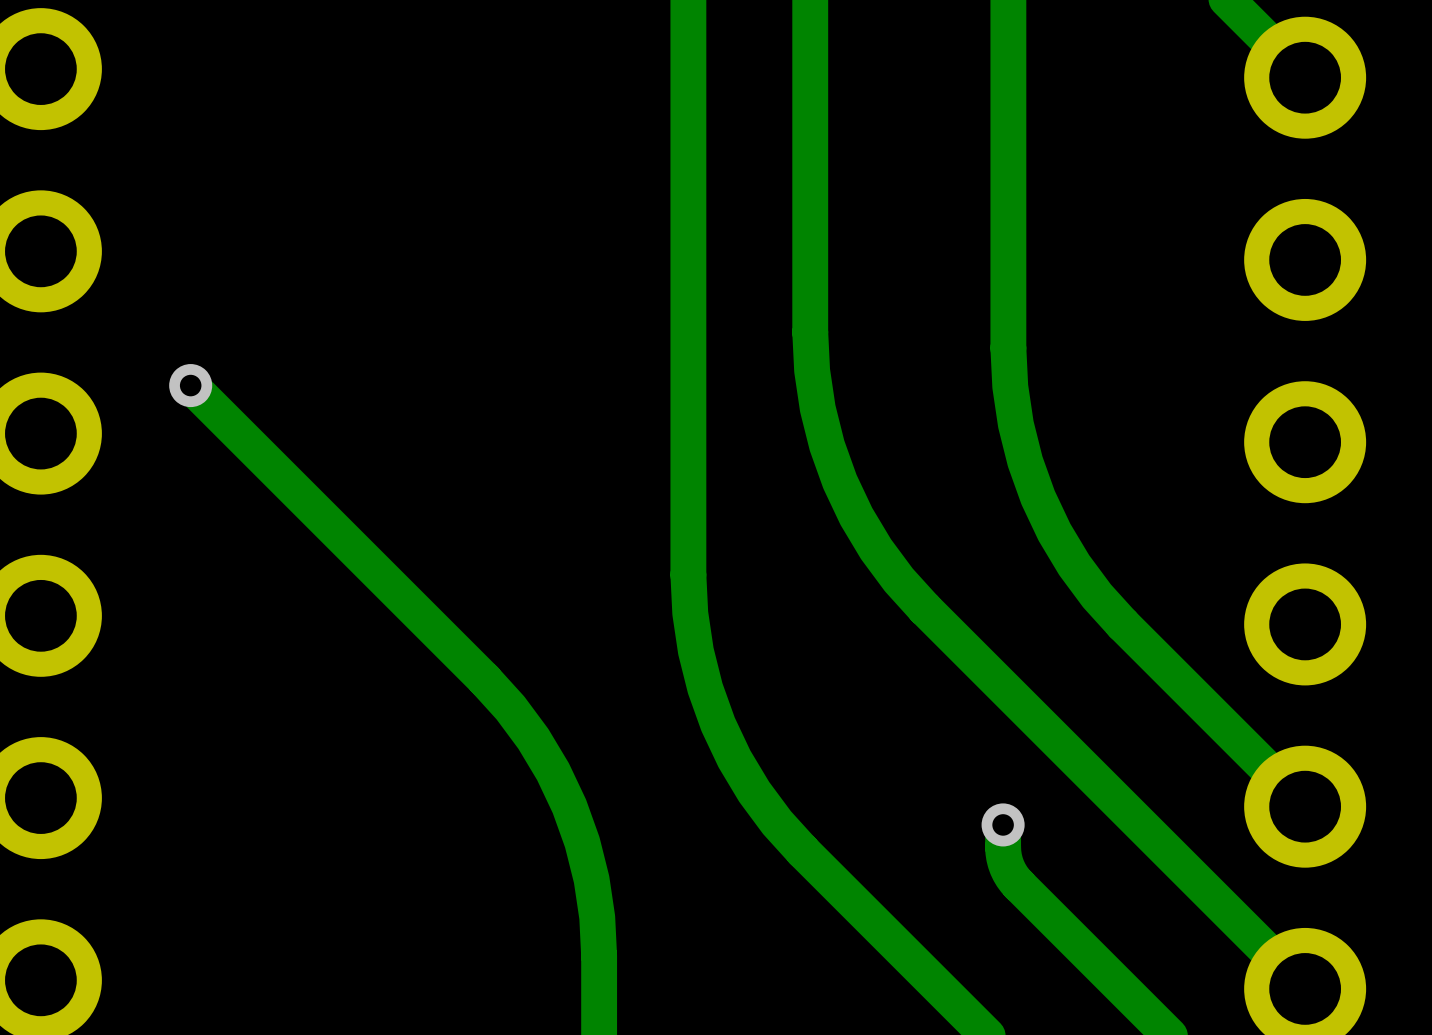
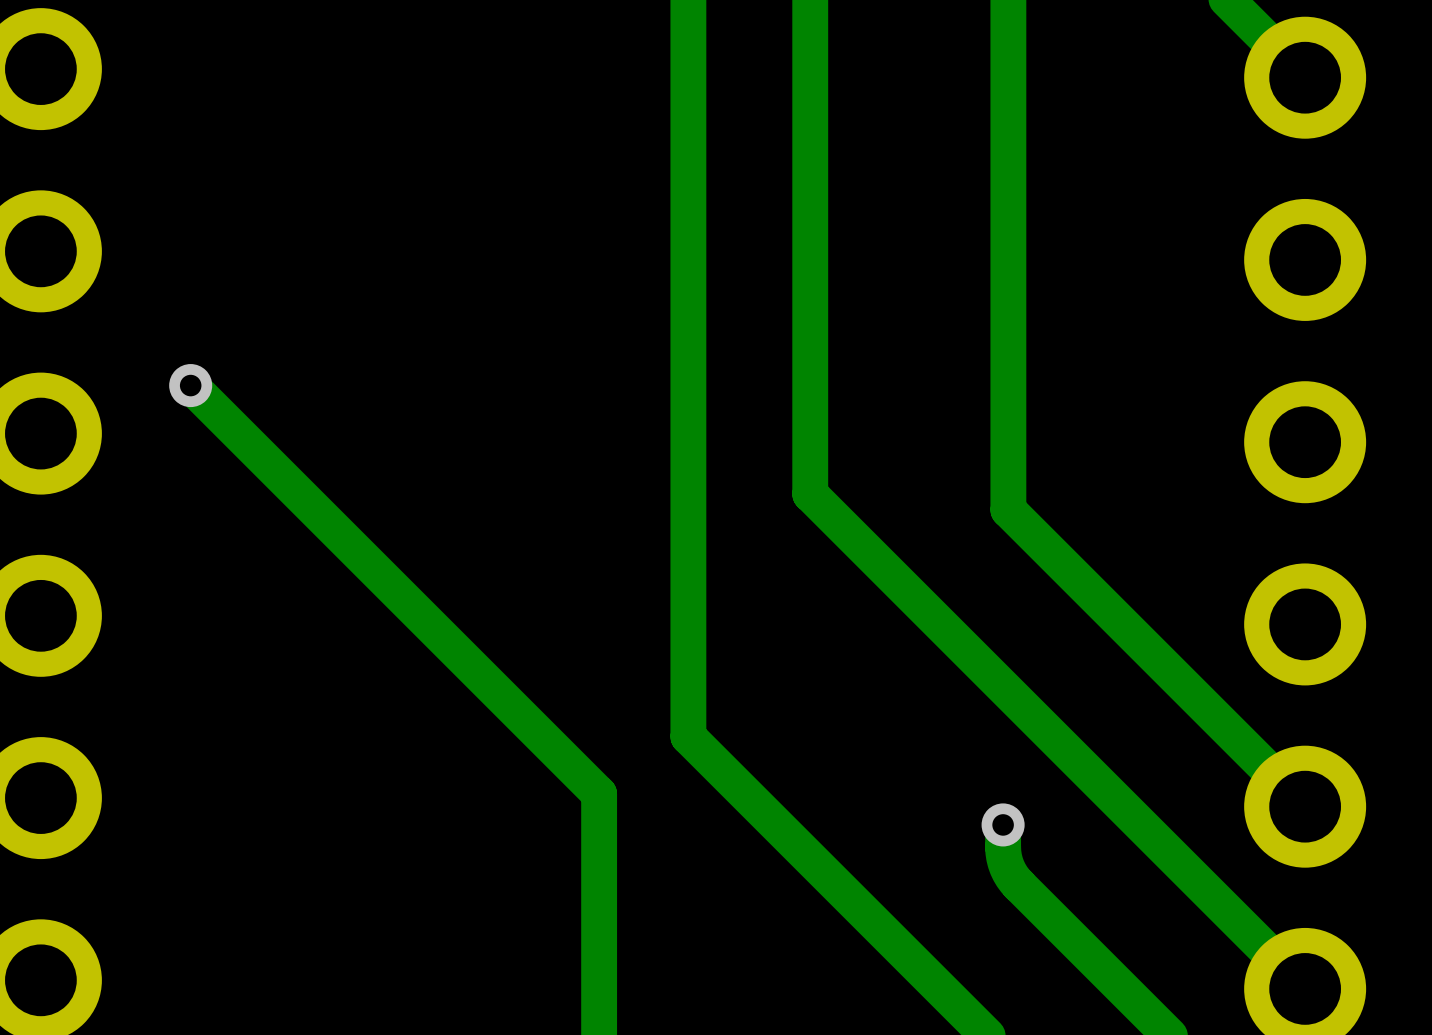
track: (810, 332) (812, 370) (817, 408) (827, 445) (839, 481) (856, 516) (876, 549) (898, 580) (924, 608) -> (810, 332) (810, 494) (924, 608)
track: (1008, 348) (1010, 386) (1015, 424) (1025, 461) (1038, 497) (1054, 532) (1074, 565) (1097, 595) (1122, 624) -> (1008, 348) (1008, 509) (1122, 624)
track: (688, 574) (690, 613) (695, 651) (705, 688) (718, 724) (734, 758) (754, 791) (777, 822) (802, 851) -> (688, 574) (688, 736) (802, 851)
track: (484, 679) (510, 708) (533, 738) (553, 771) (569, 806) (582, 842) (591, 879) (597, 917) (599, 955) -> (484, 679) (599, 794) (599, 955)

